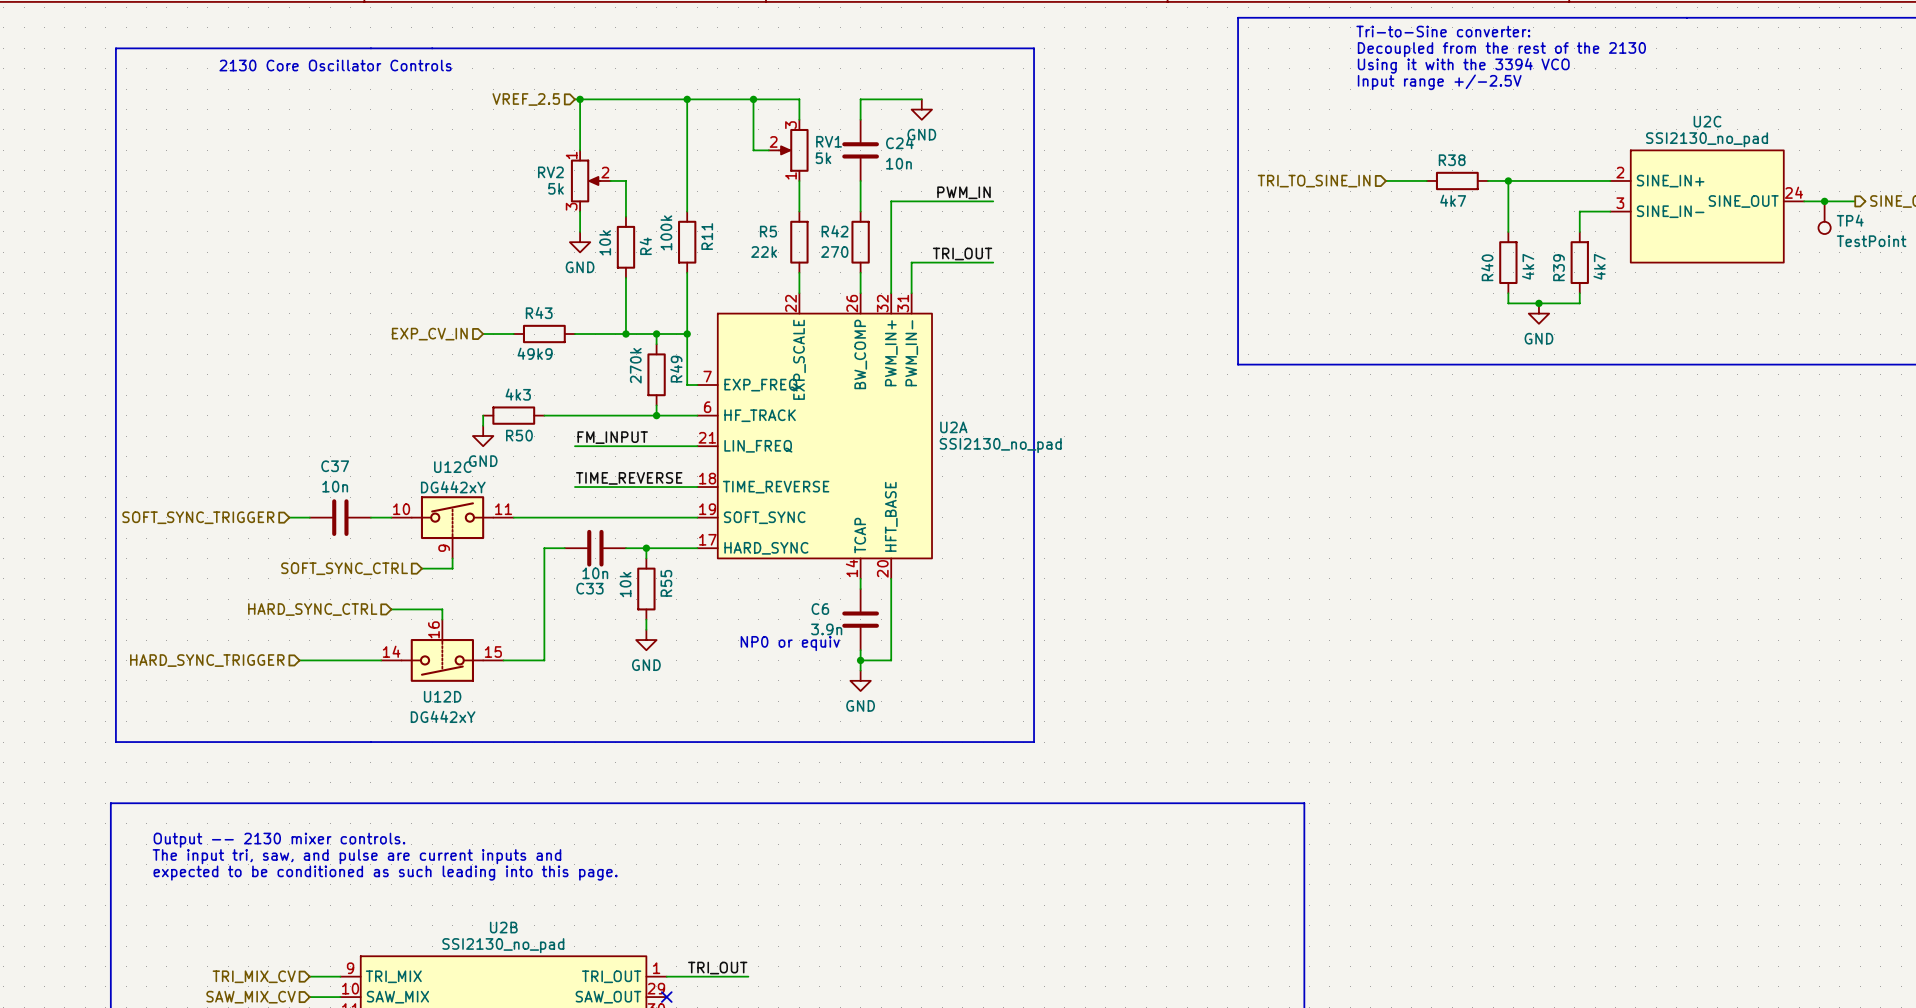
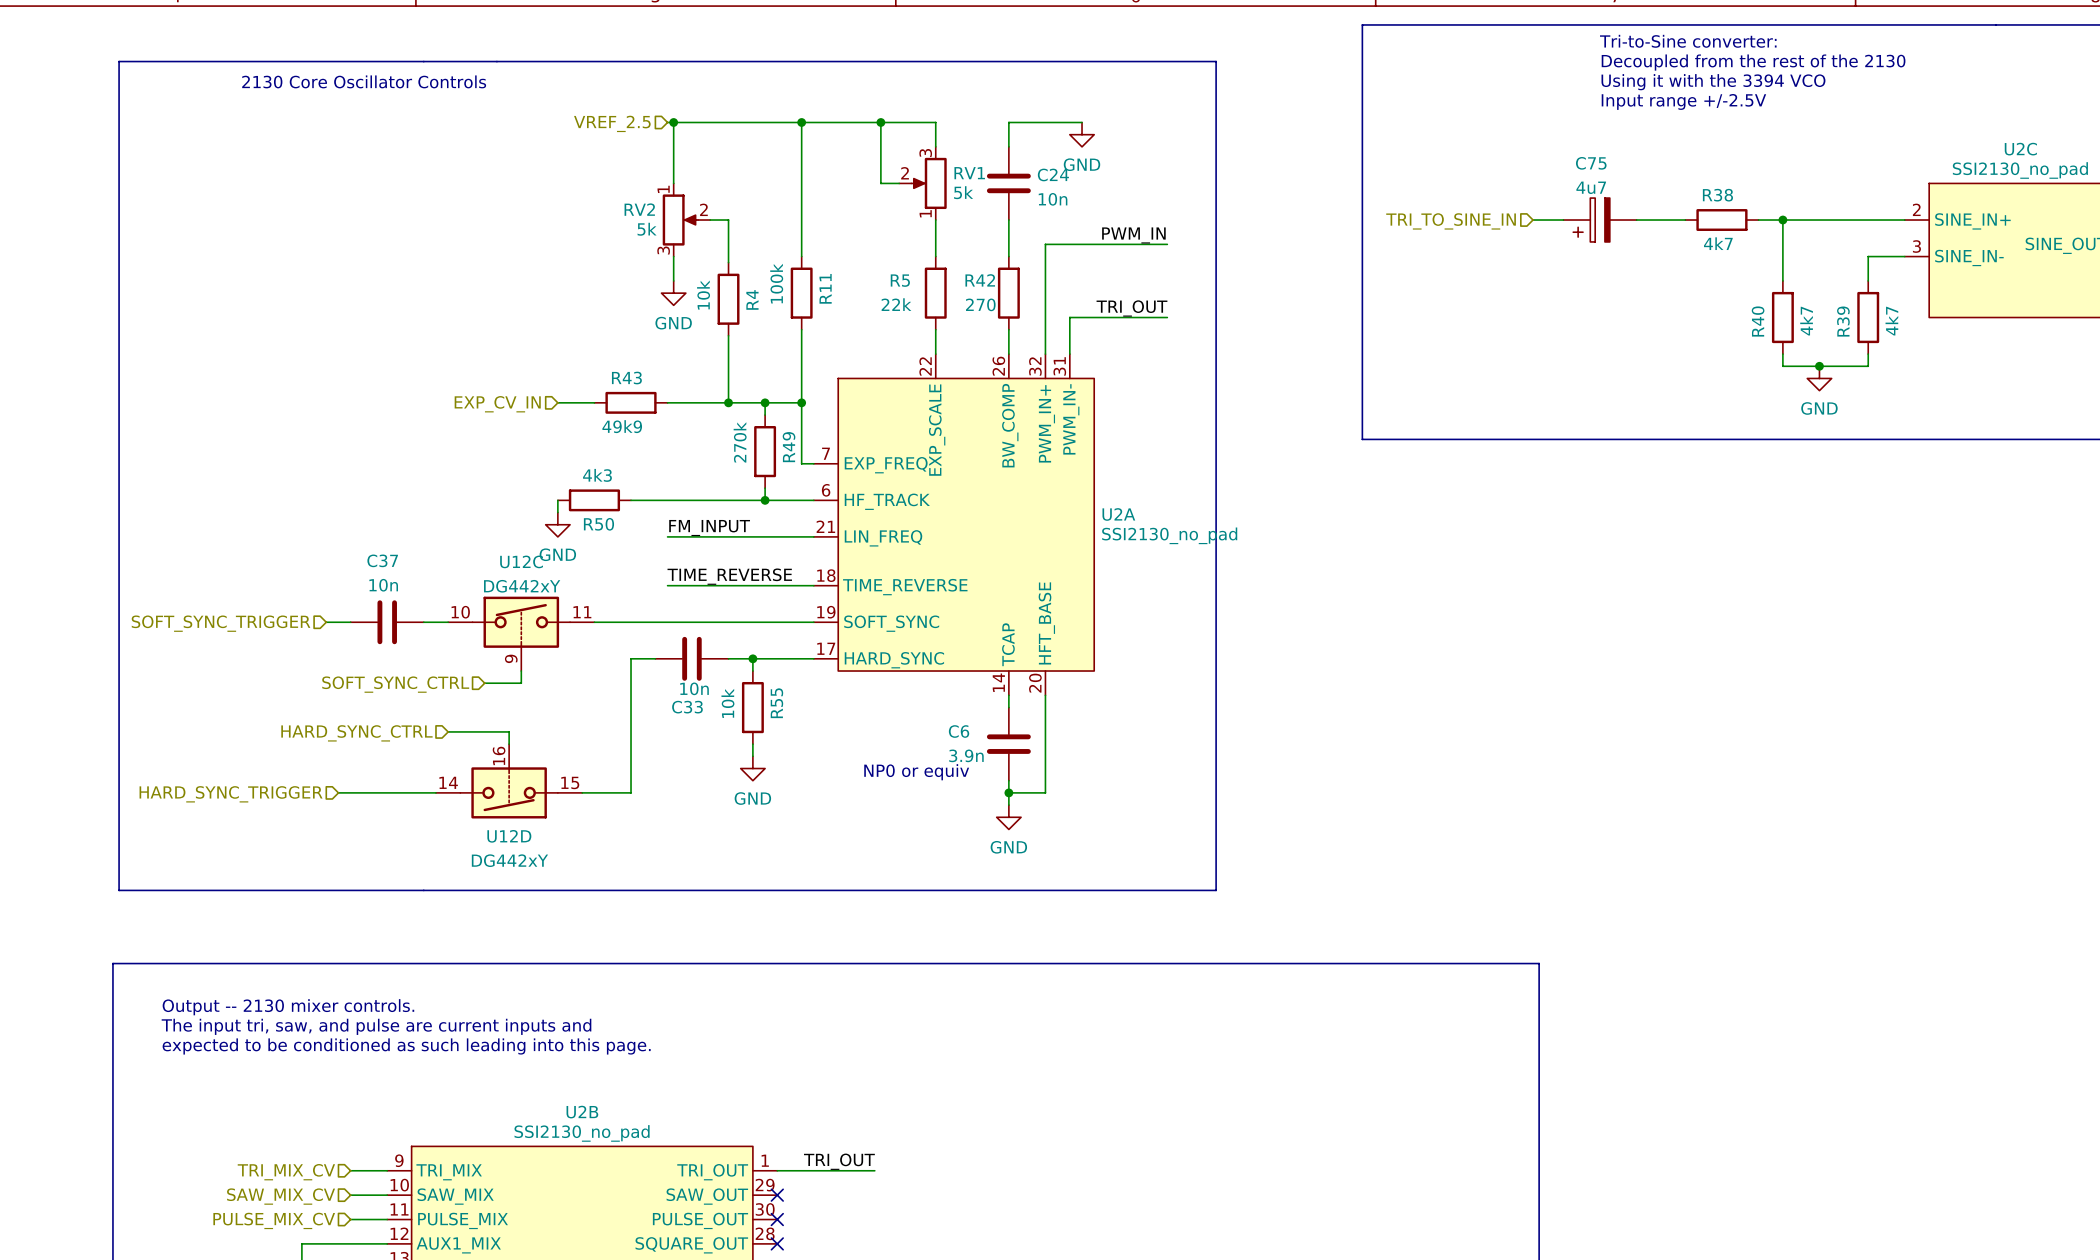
line: (1238, 17) (1238, 364) -> (1459, 24) (1362, 24) (1362, 439) (1459, 439)
wire: none -> (1533, 220) (1563, 220)
C75: none -> 4u7 (1600, 220)
hierarchical label position: TRI_TO_SINE_IN (1314, 181) -> TRI_TO_SINE_IN (1451, 221)

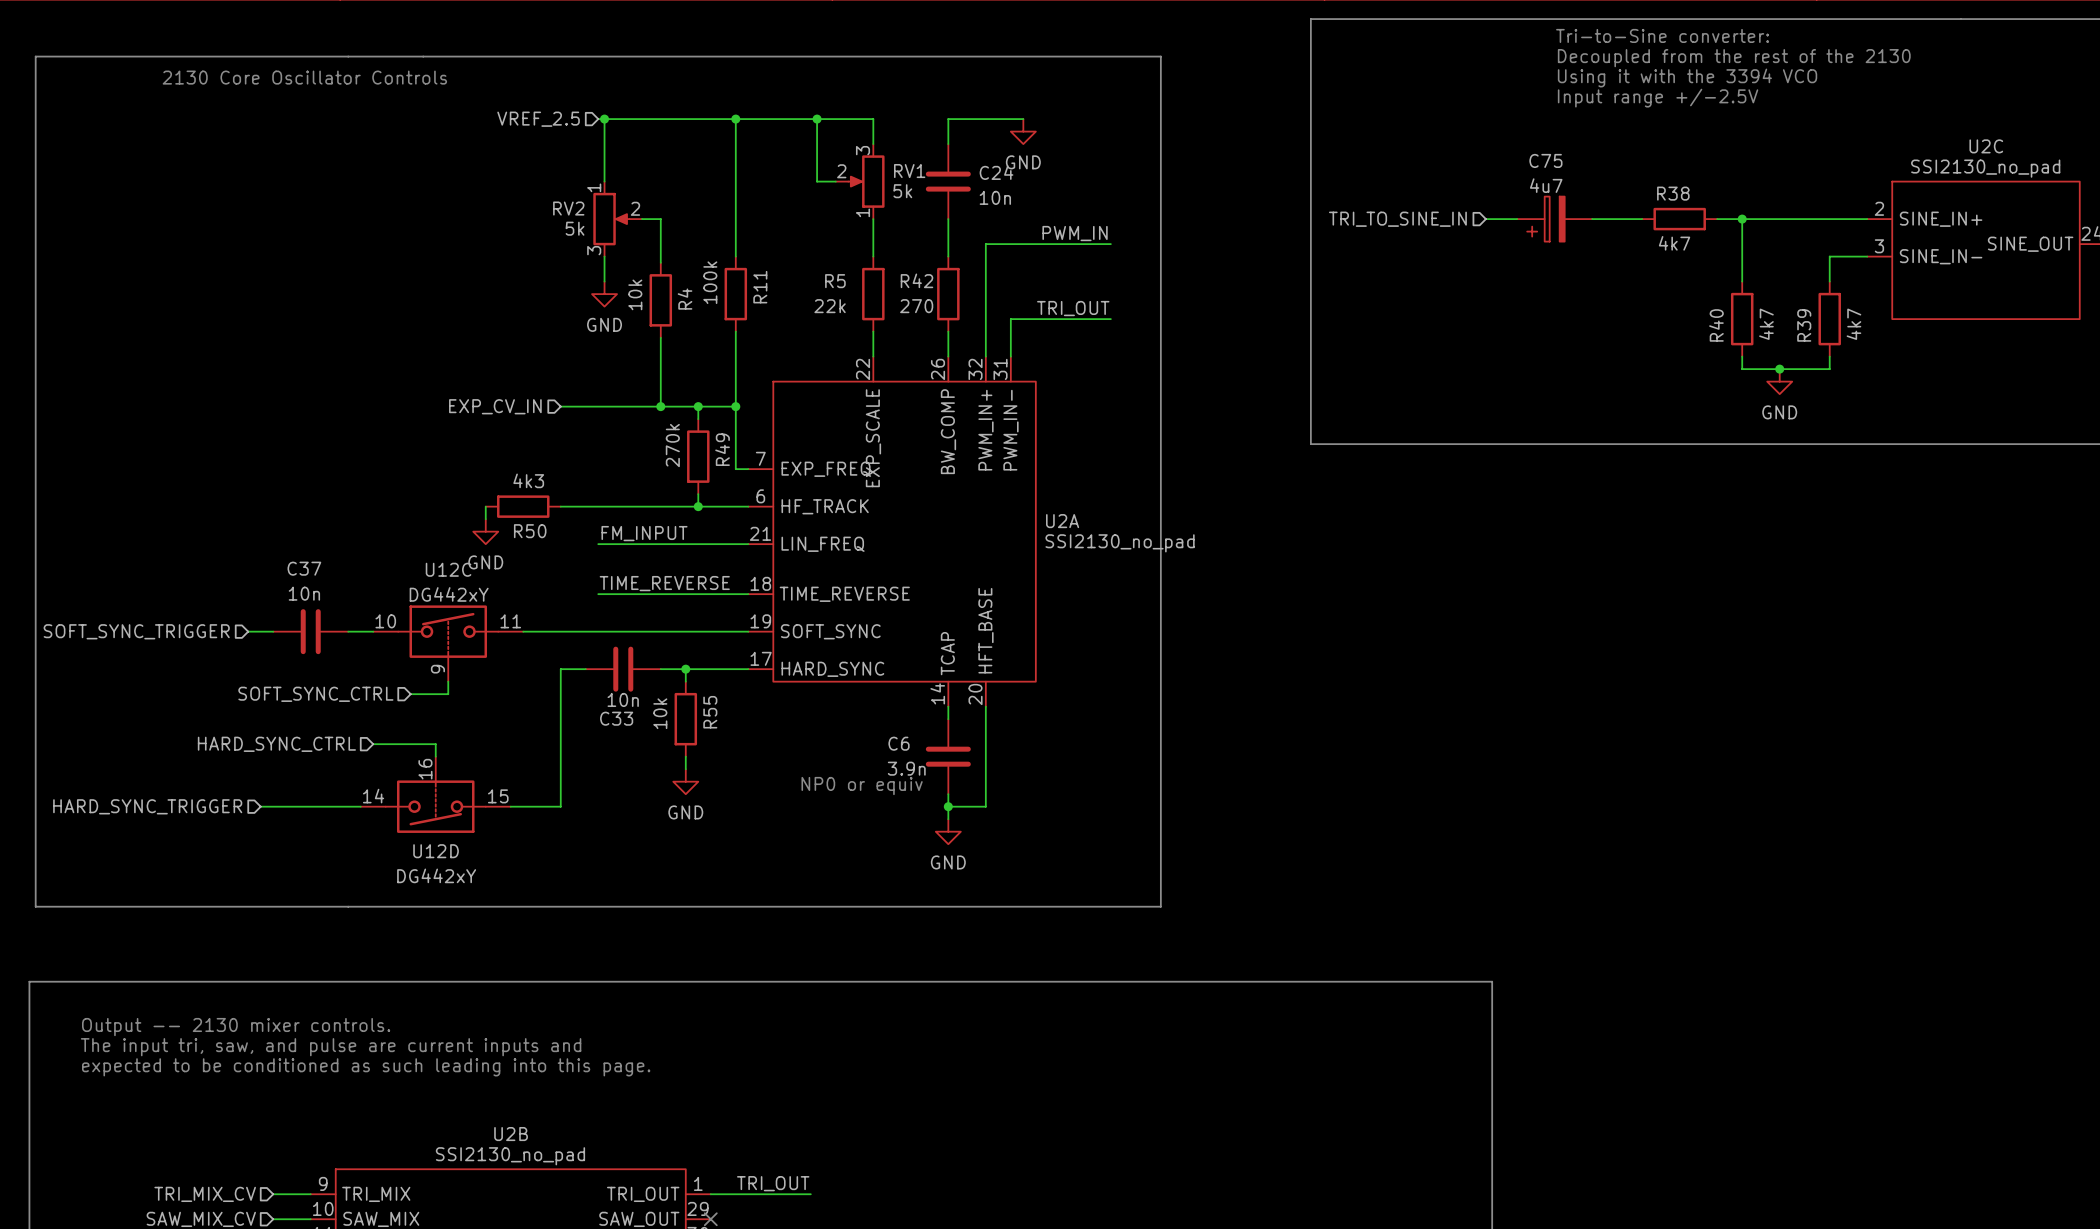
wire: (557, 402) (594, 402) -> (560, 406) (598, 406)
R43: 49k9 (631, 402) -> none
hierarchical label position: EXP_CV_IN (497, 404) -> EXP_CV_IN (495, 406)

